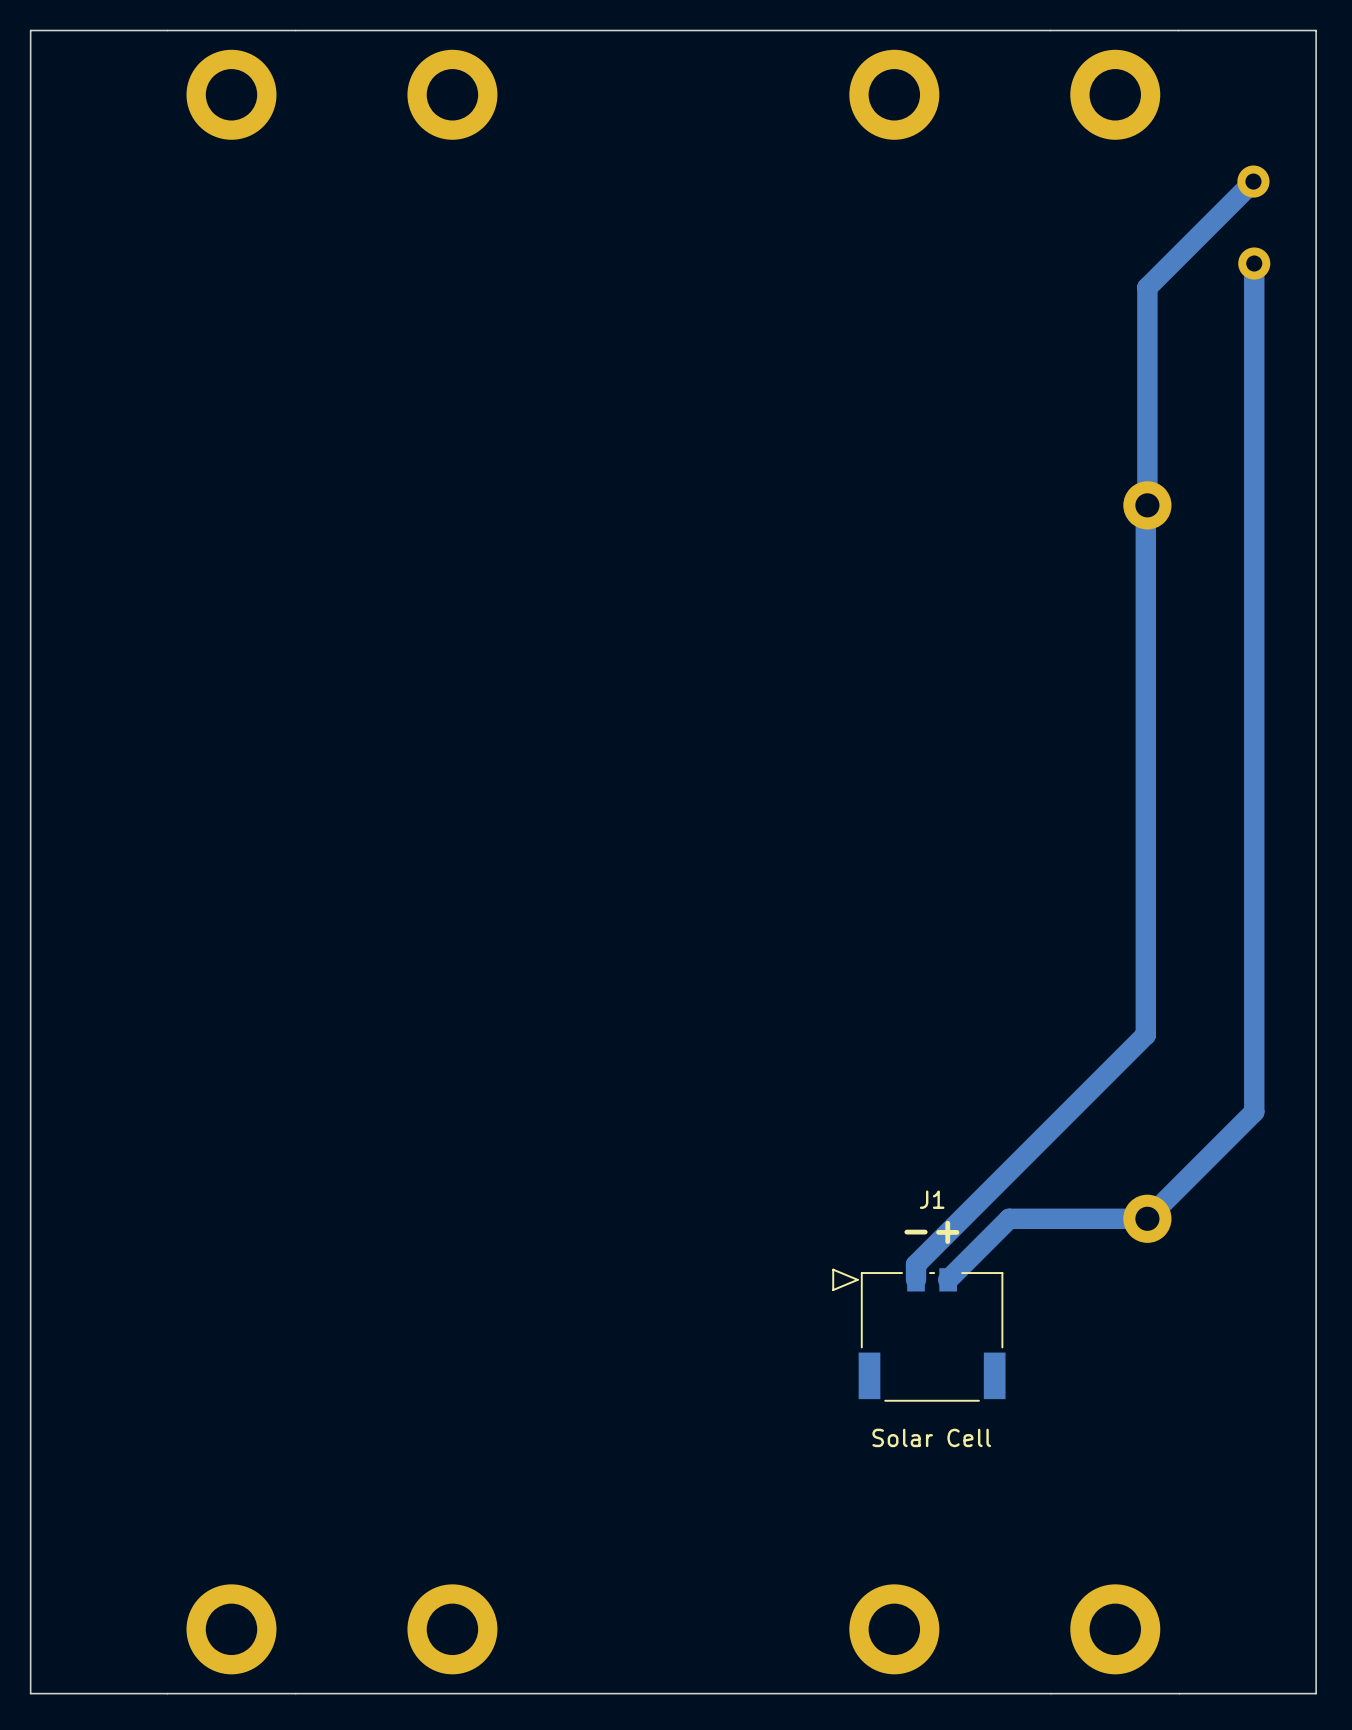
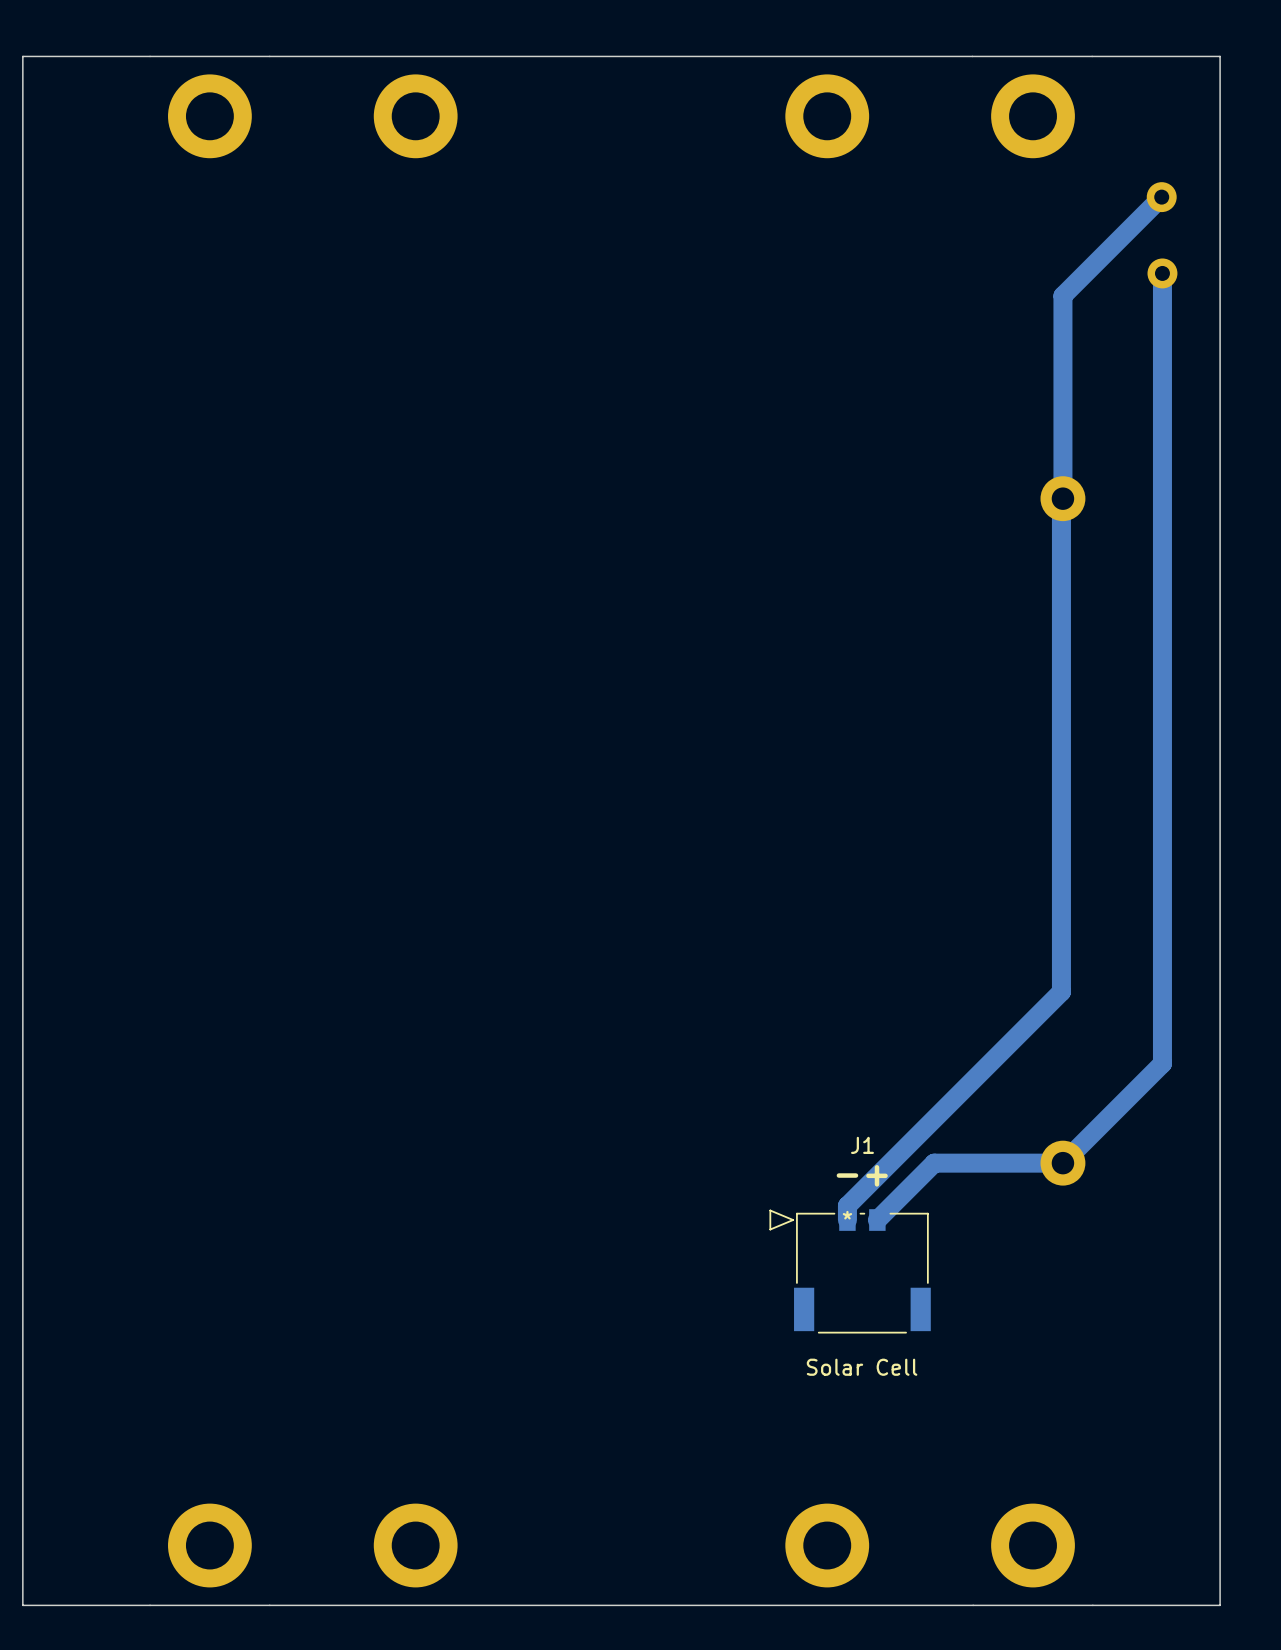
J1 text: none -> * (847, 1215)

